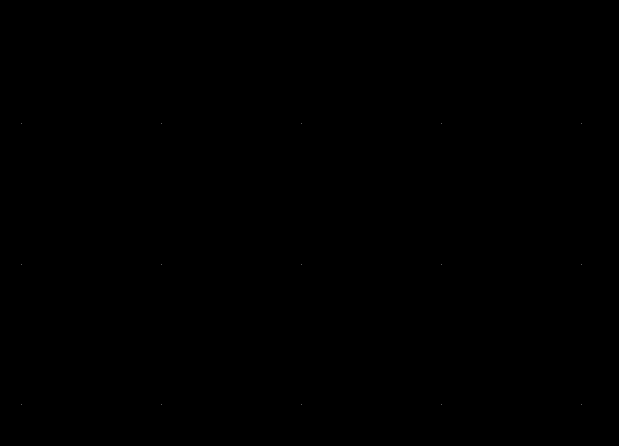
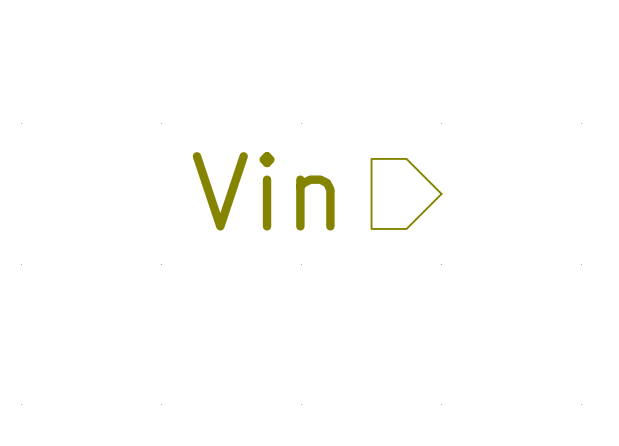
hierarchical label: none -> Vin (263, 191)

